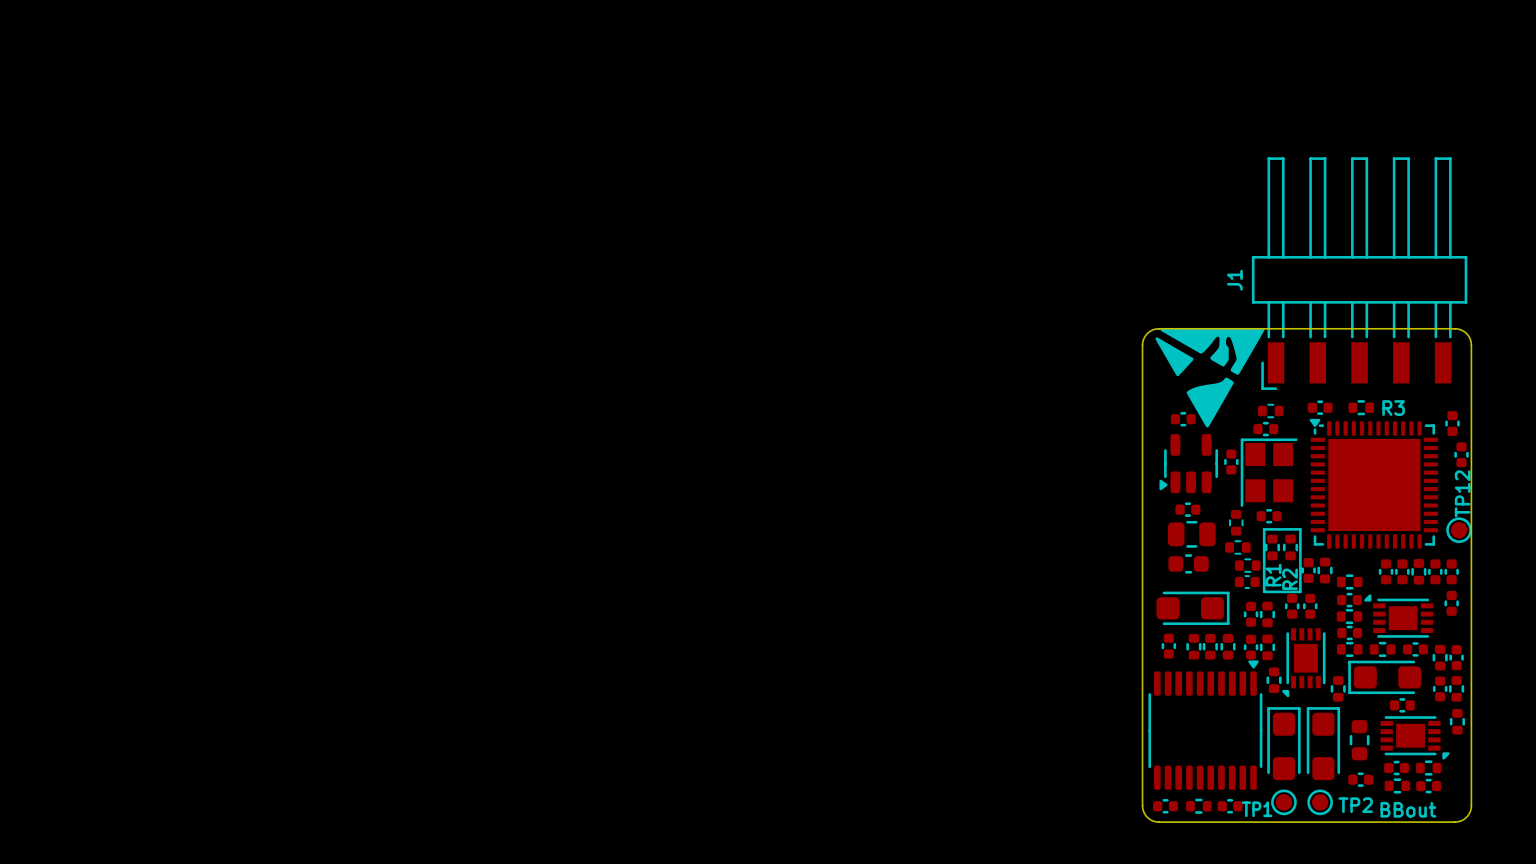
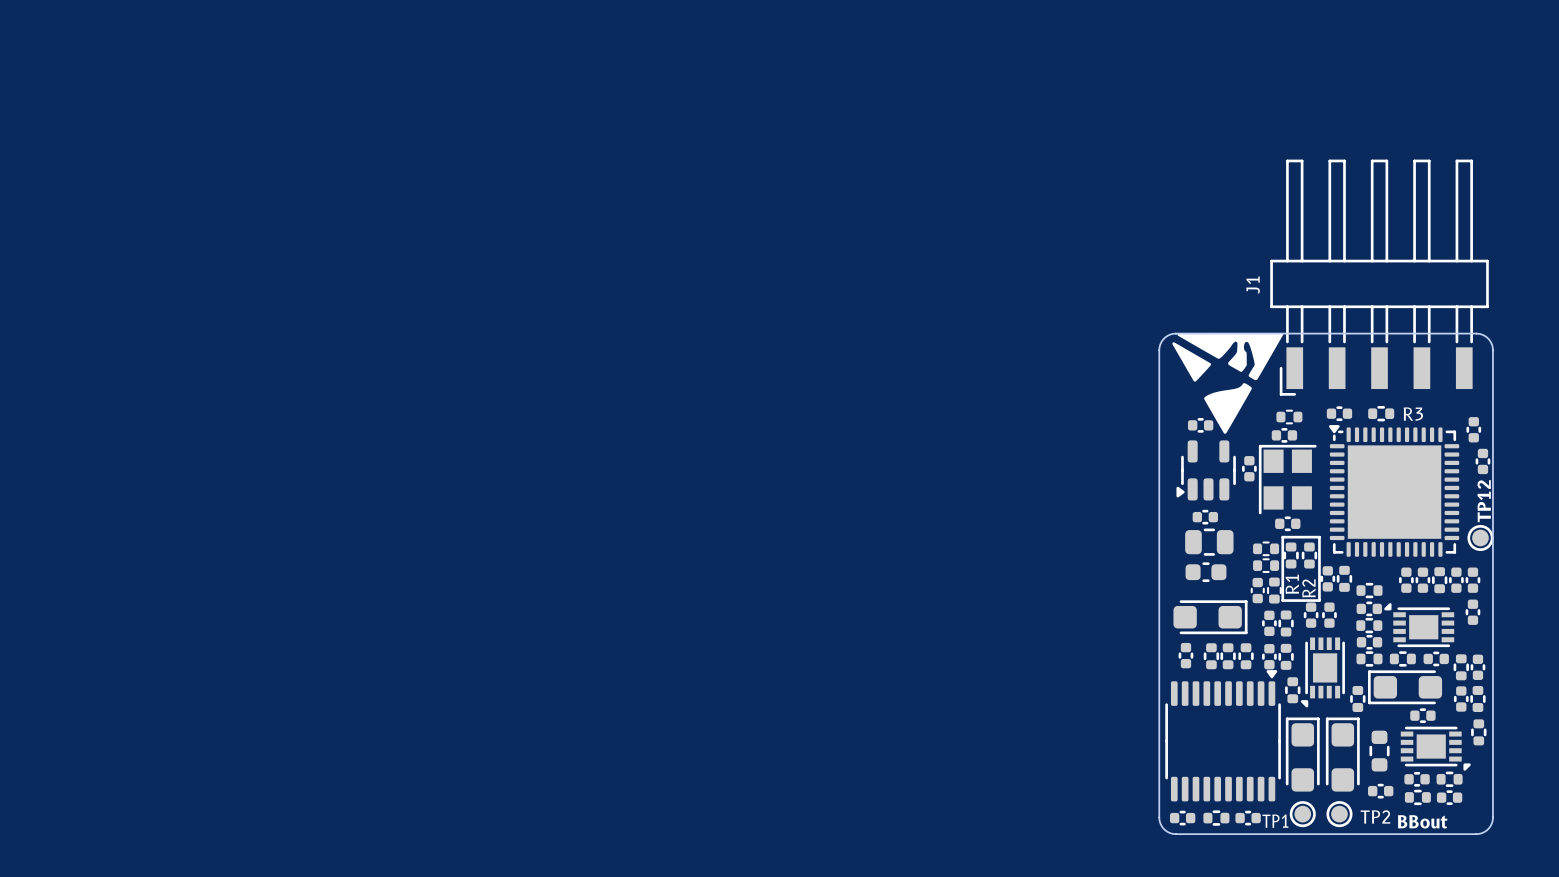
part: (1236, 522) -> none
part: none -> (1266, 548)
part: (1237, 547) -> none
part: none -> (1266, 565)
part: (1247, 565) -> none
part rotation: 0° (1247, 582) -> 90° clockwise (1257, 590)
part: none -> (1274, 590)

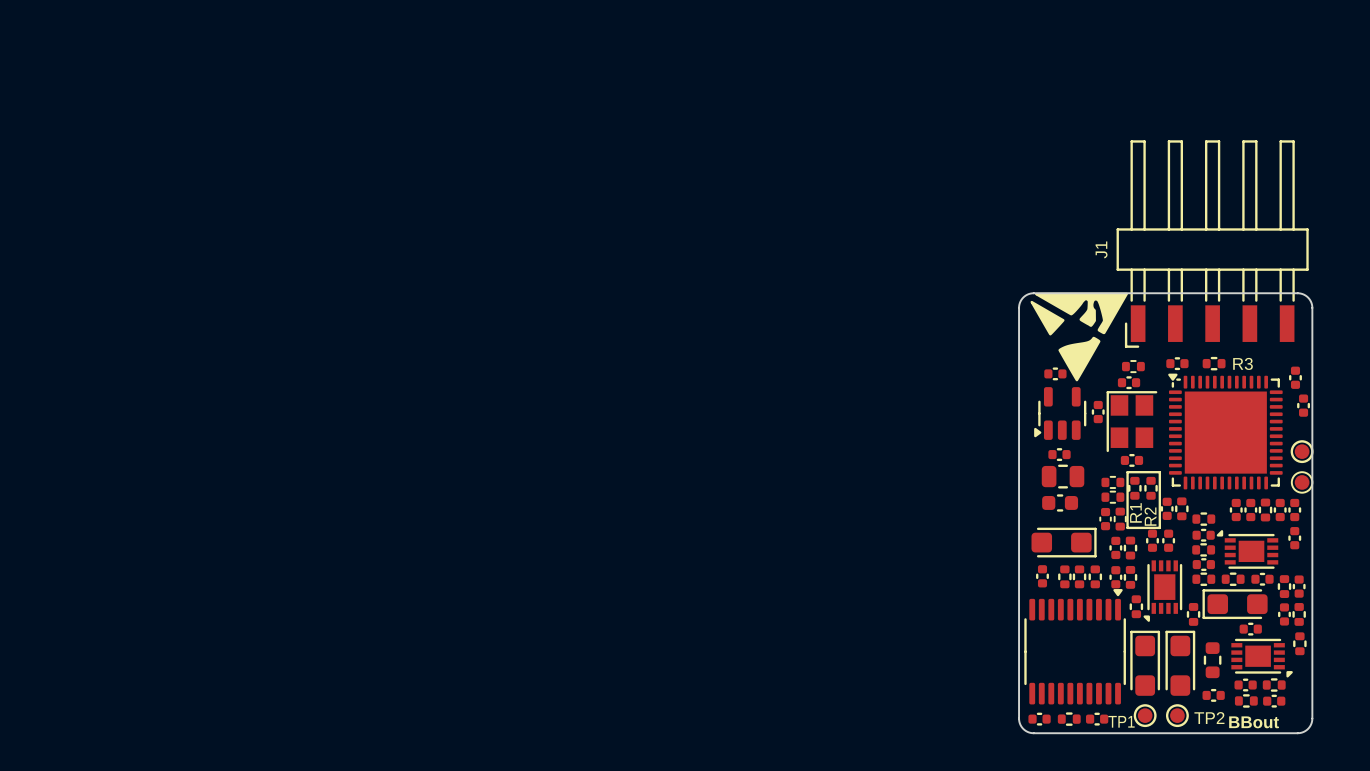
part: none -> (1302, 451)
TP12: (1480, 537) -> none
part: none -> (1302, 482)

